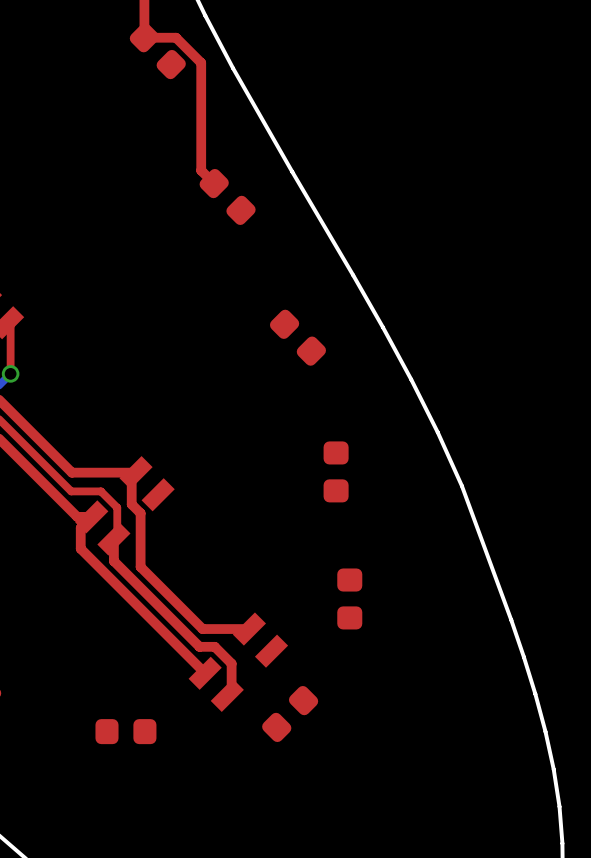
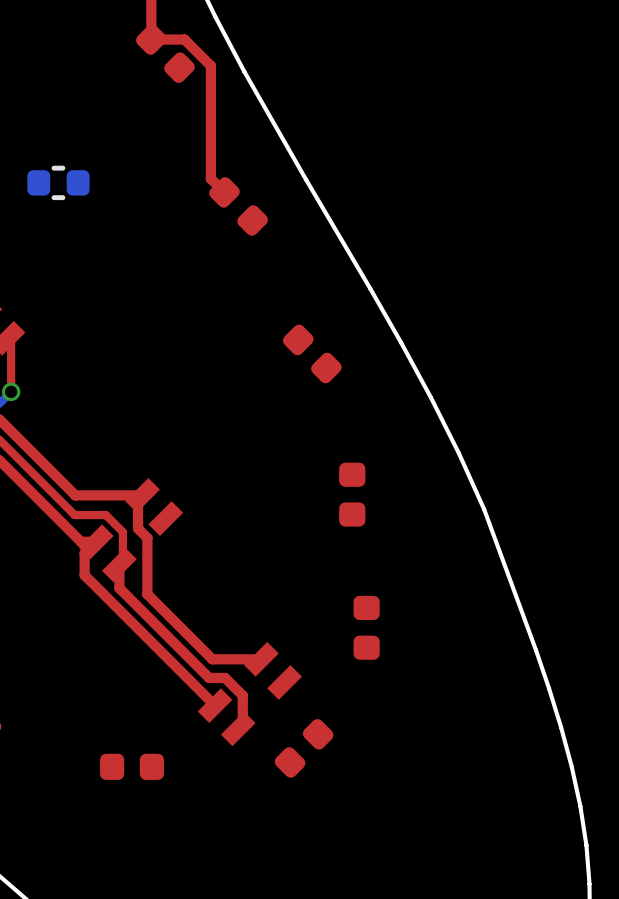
part: none -> (58, 182)

